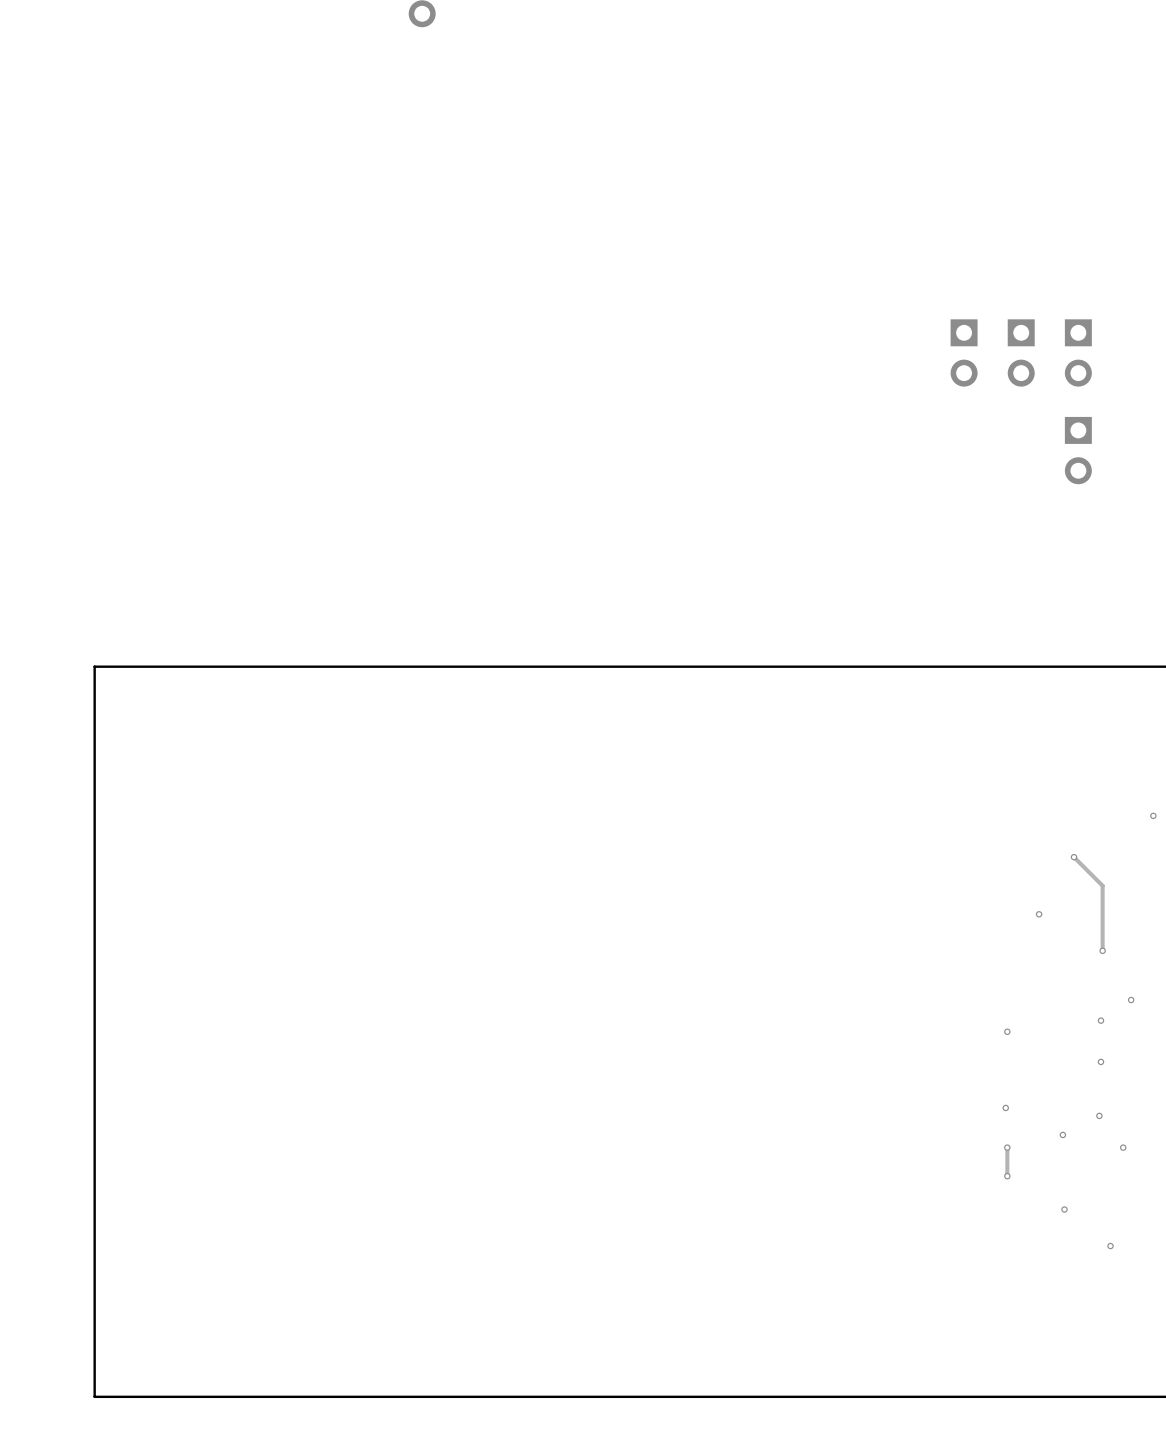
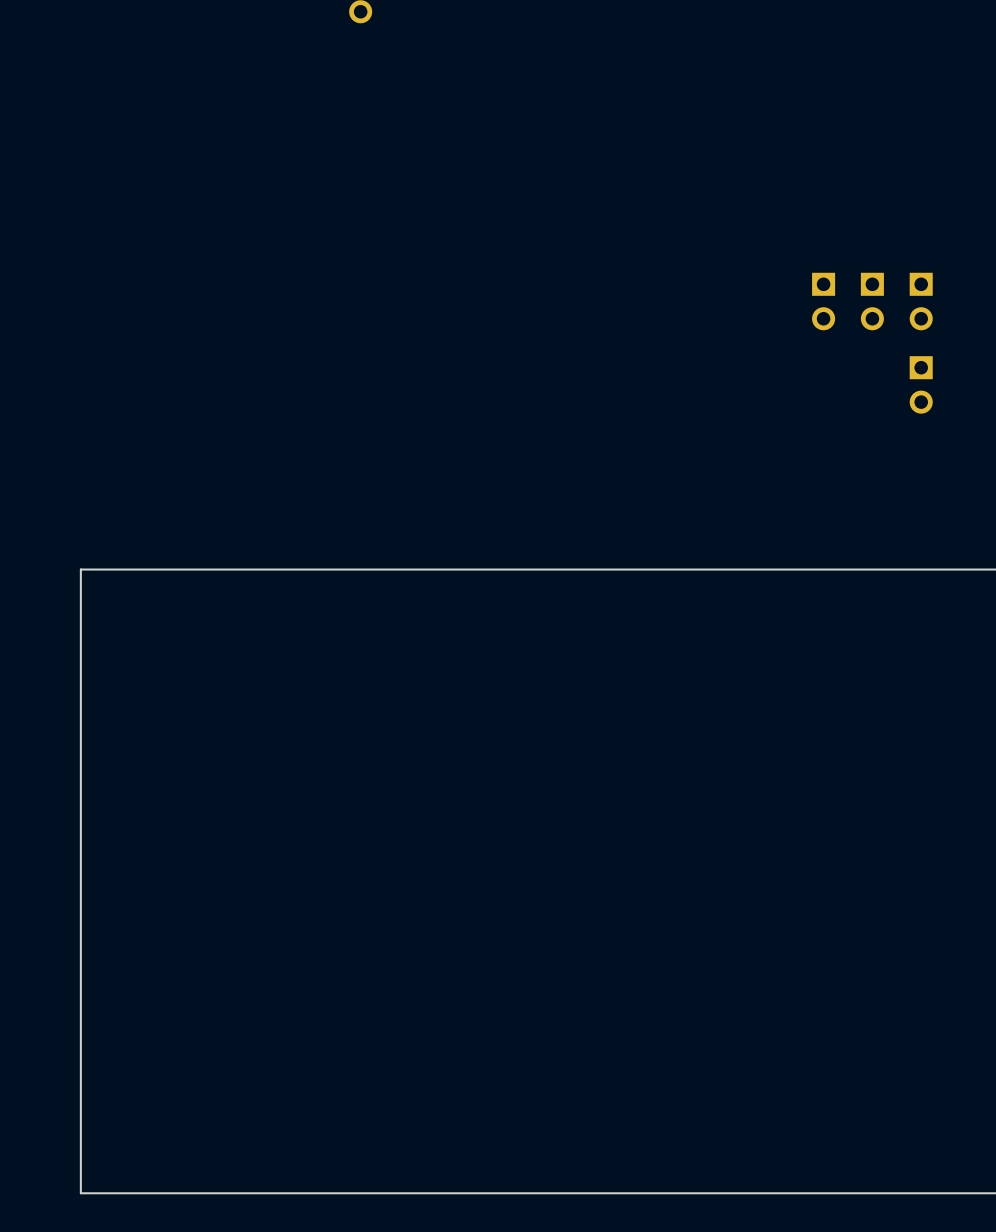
via: (1153, 815) -> none
track: (1074, 857) (1102, 885) (1102, 950) -> none
via: (1074, 857) -> none
via: (1039, 914) -> none
via: (1102, 950) -> none
via: (1131, 1000) -> none
via: (1100, 1020) -> none
via: (1007, 1031) -> none
via: (1100, 1061) -> none
via: (1005, 1107) -> none
via: (1099, 1115) -> none
via: (1062, 1134) -> none
track: (1007, 1147) (1007, 1176) -> none
via: (1007, 1147) -> none
via: (1123, 1147) -> none
via: (1007, 1176) -> none
via: (1064, 1209) -> none
via: (1110, 1246) -> none

